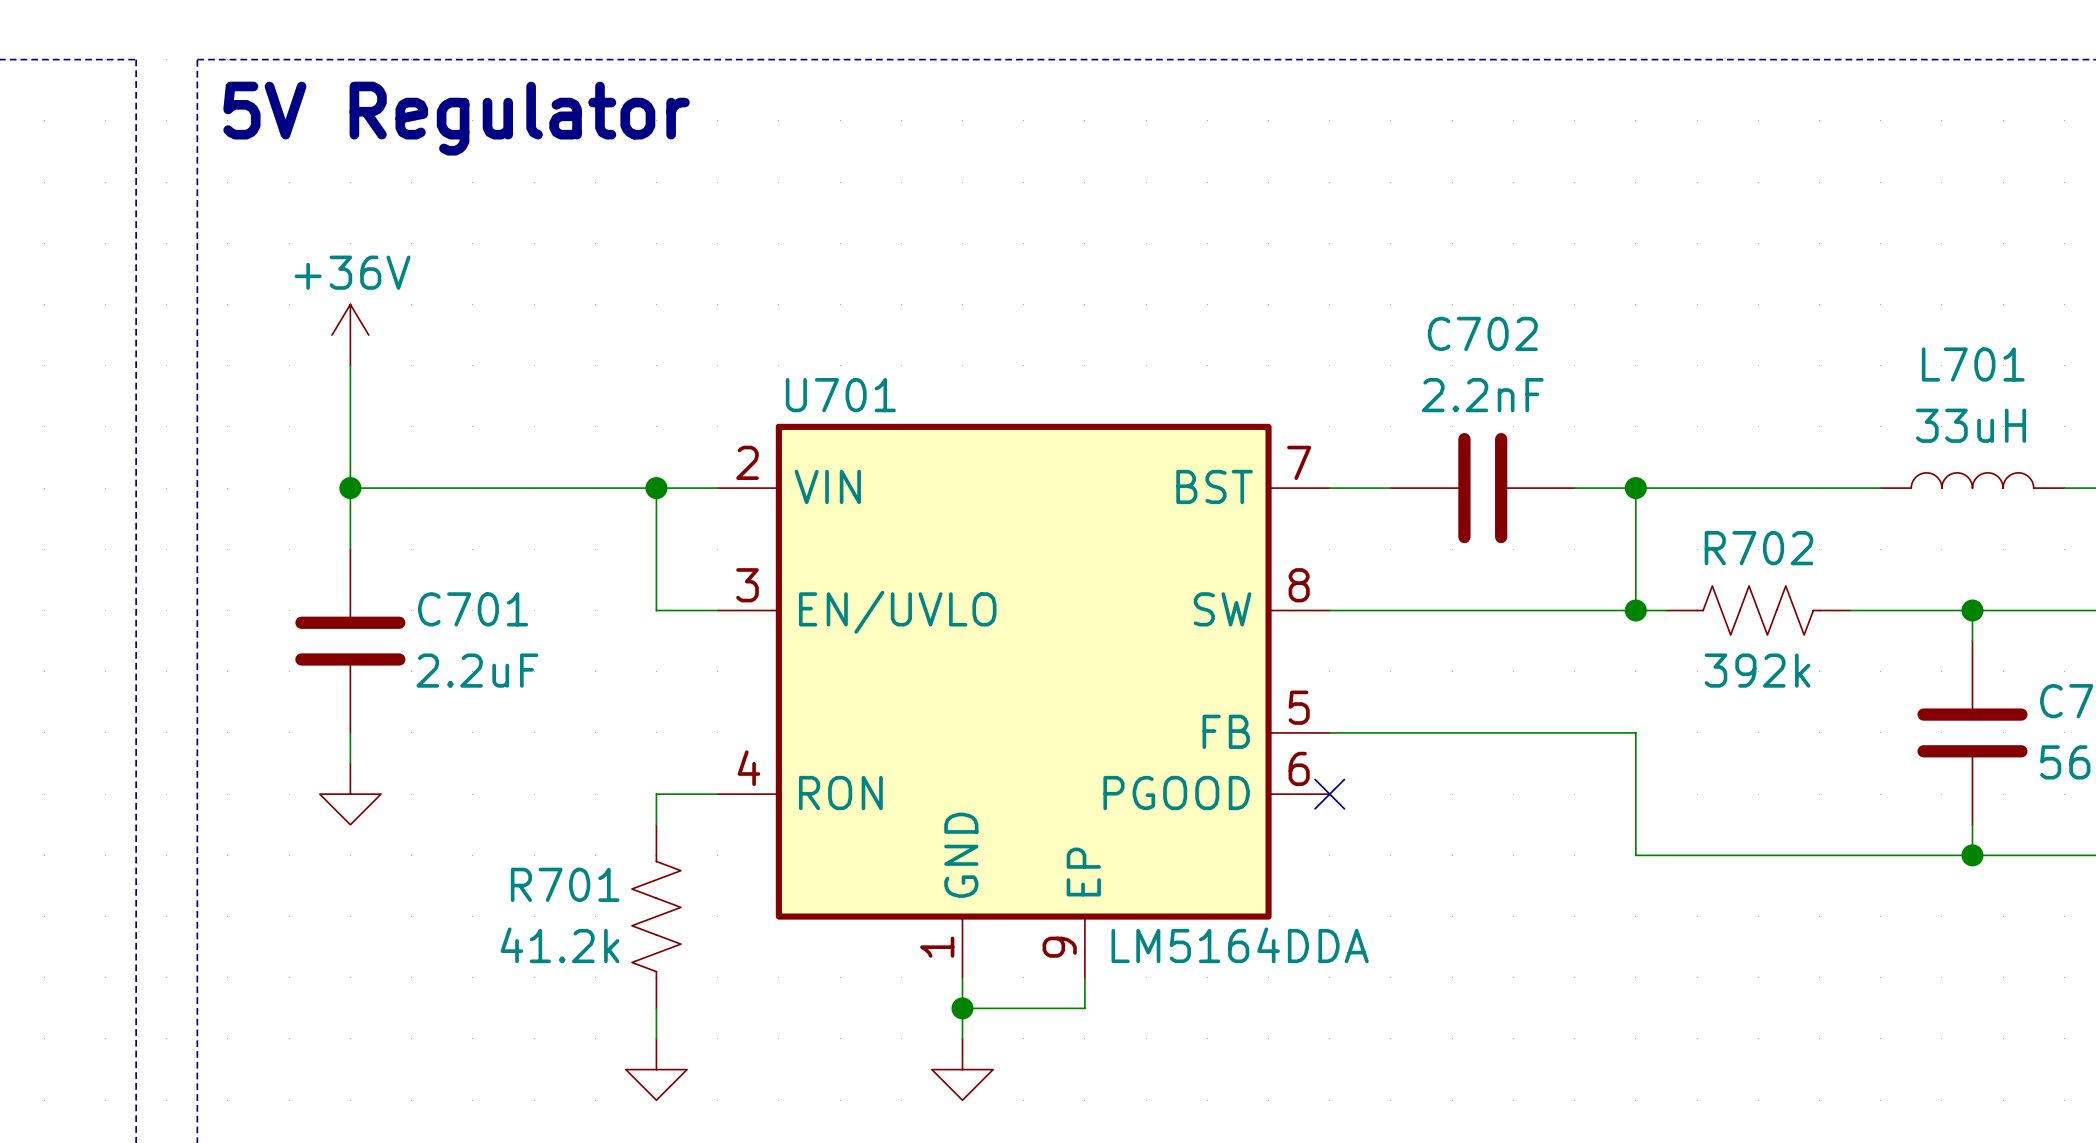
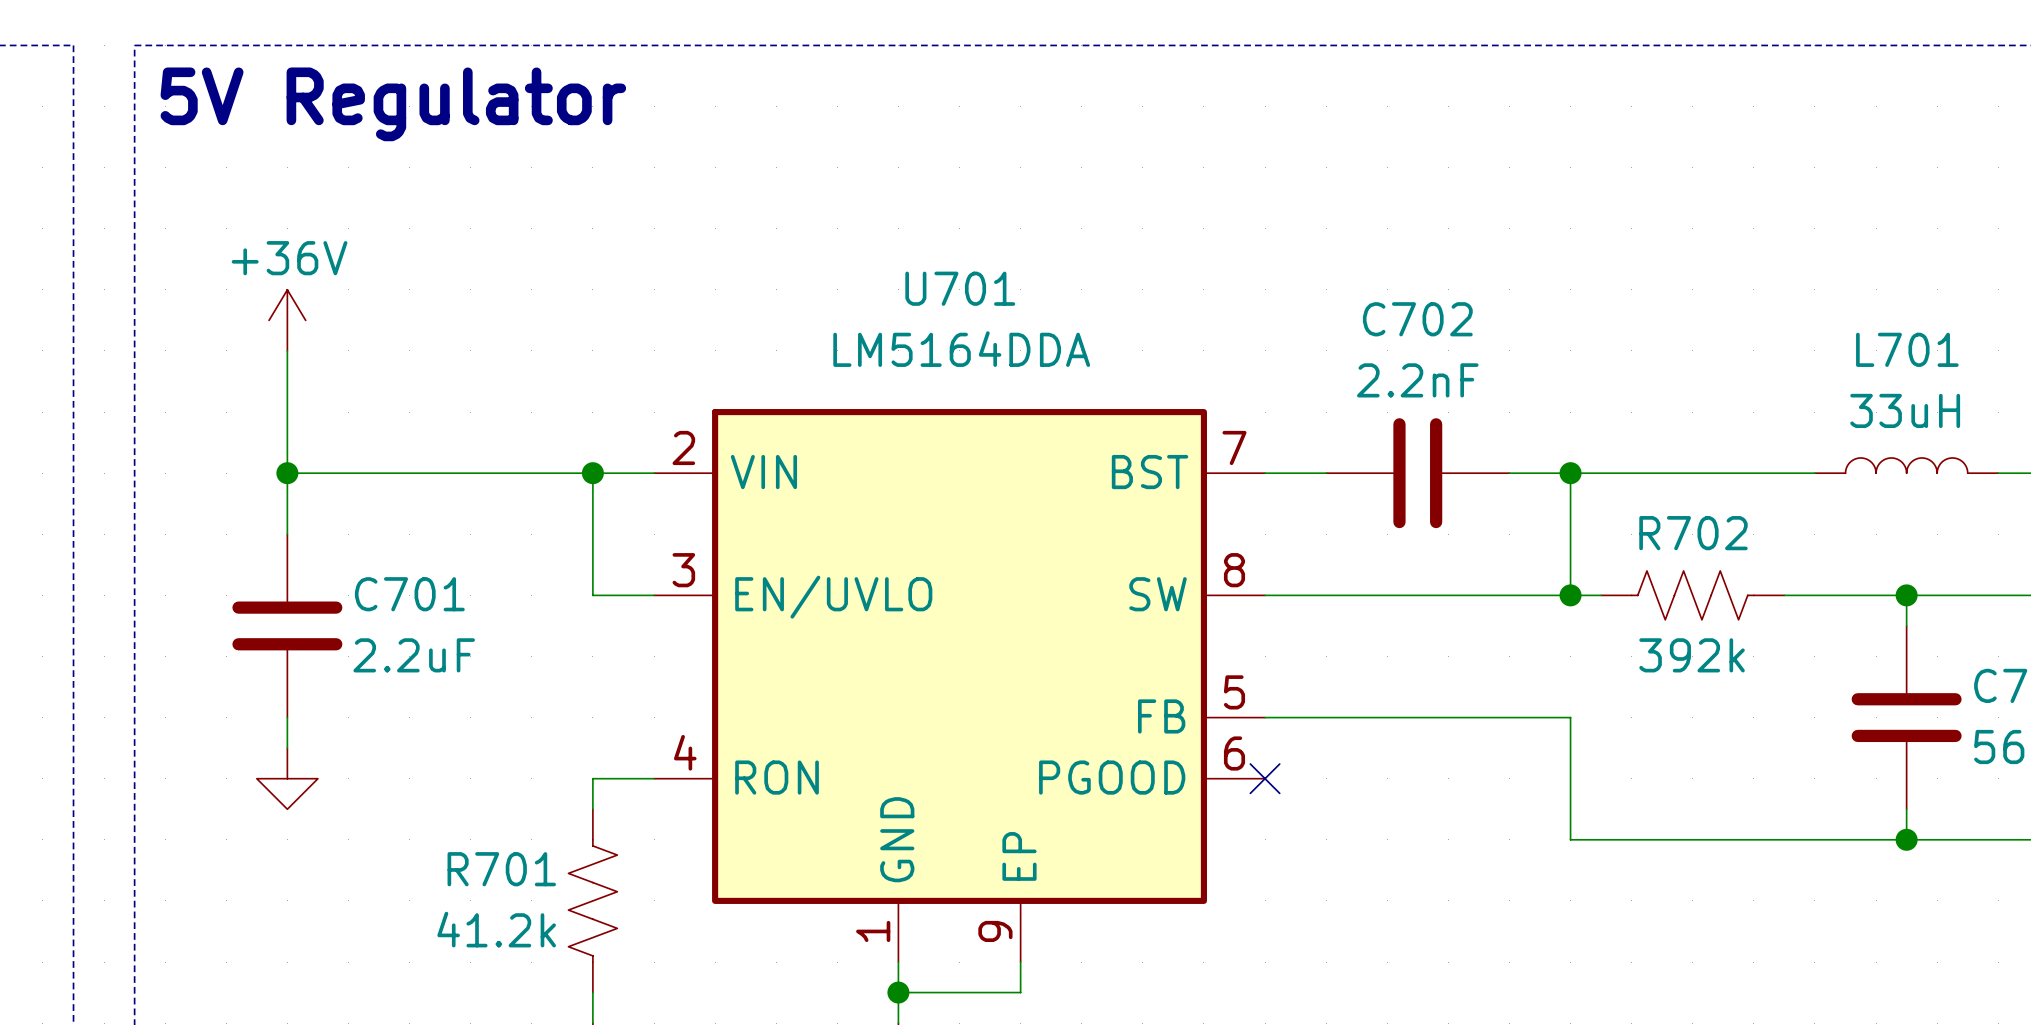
U701 name position: U701 (840, 395) -> U701 (960, 288)
U701 value position: LM5164DDA (1240, 945) -> LM5164DDA (961, 349)

